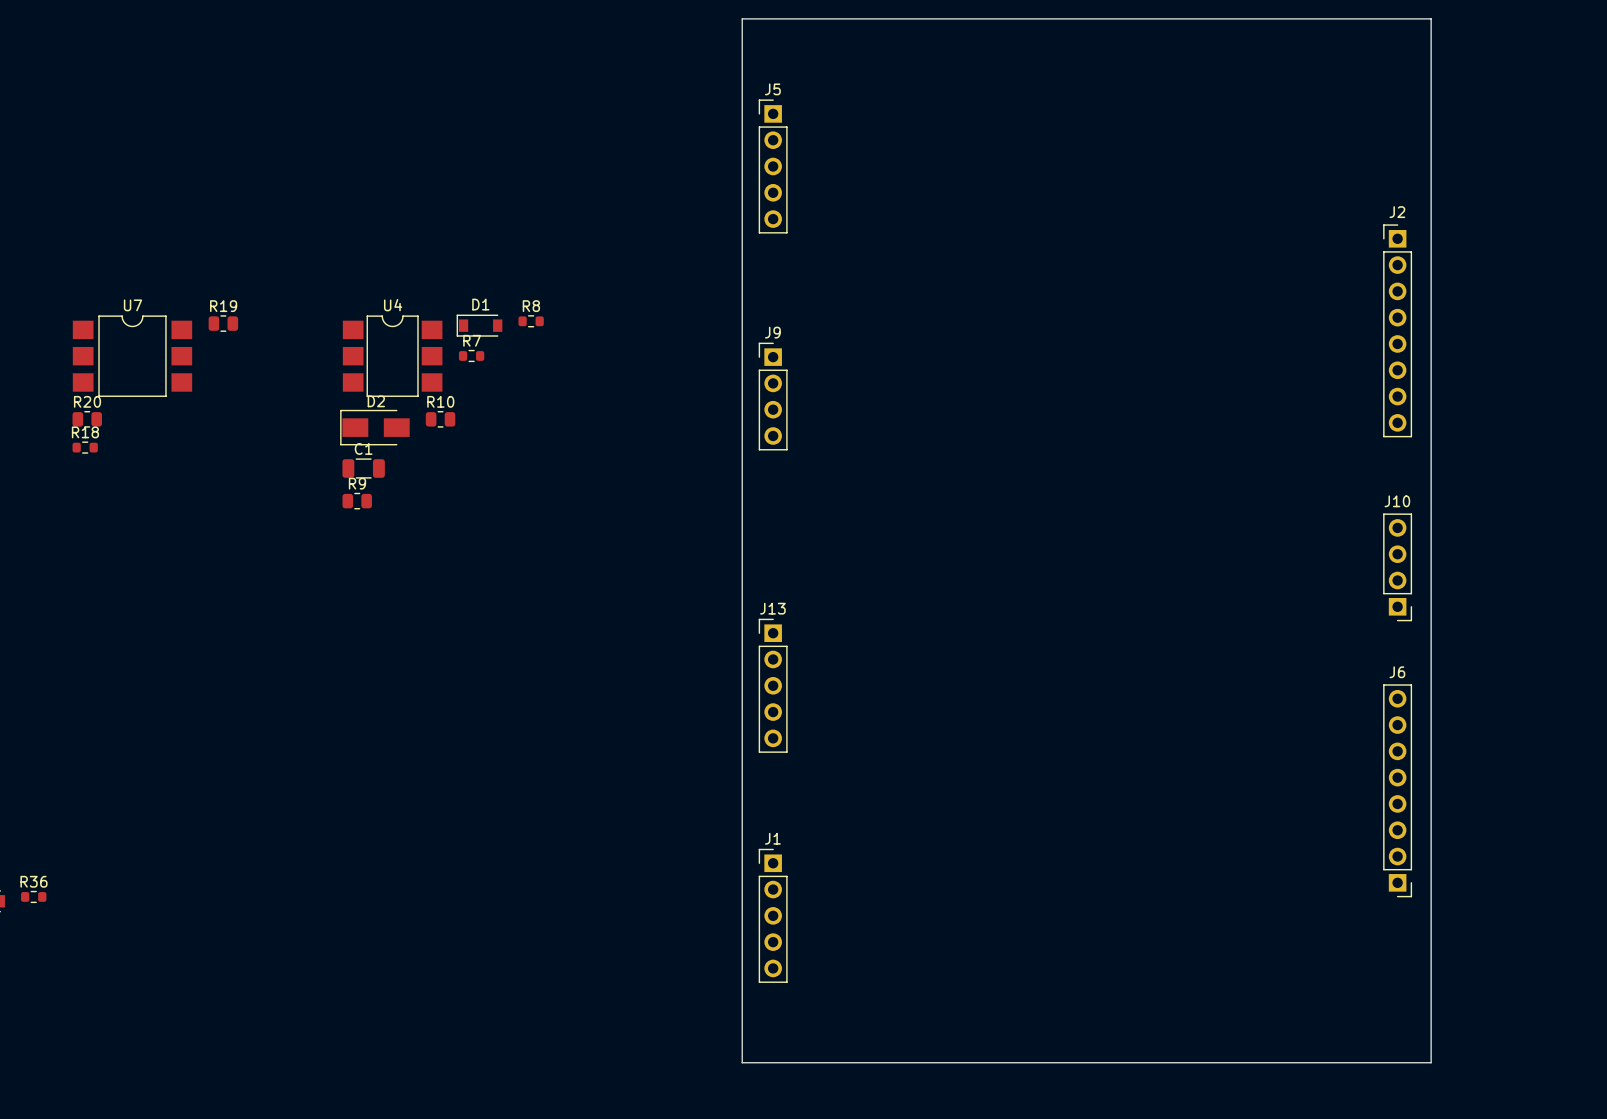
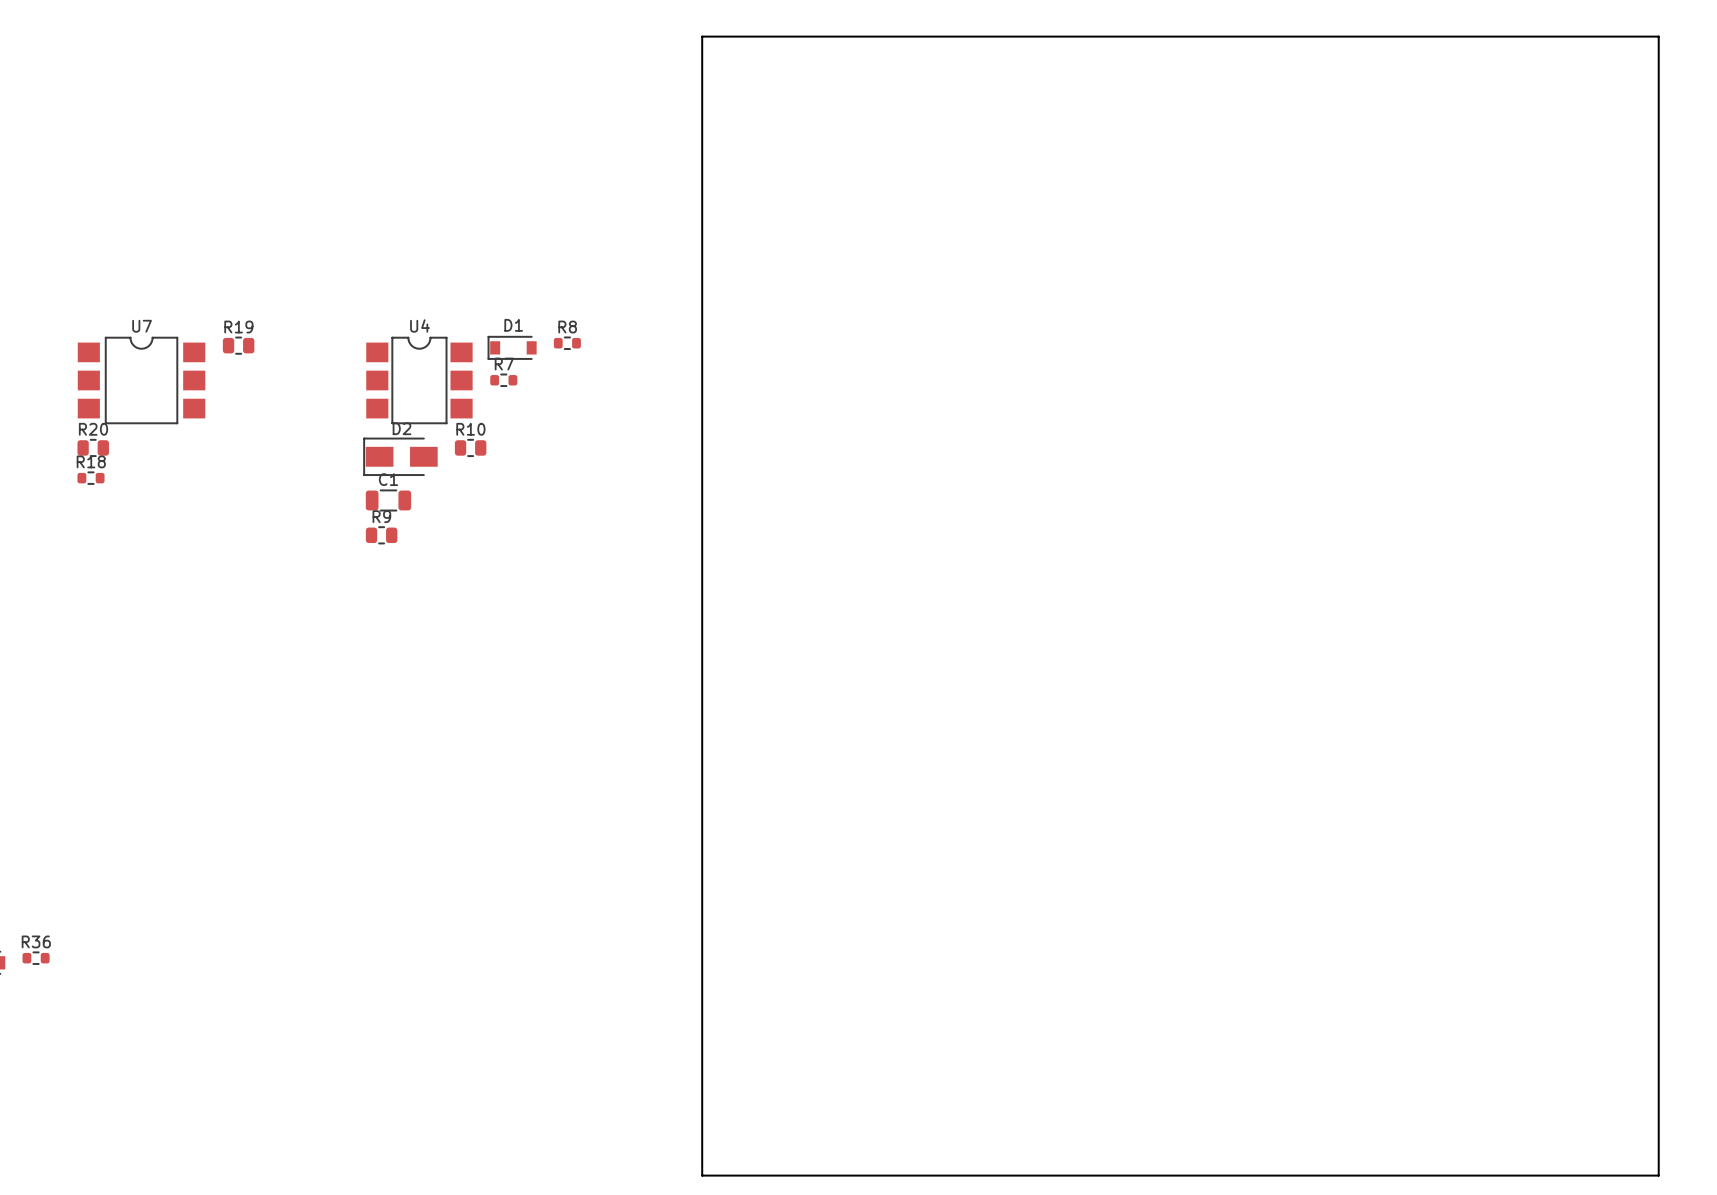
board edge: (742, 18) (742, 1062) (1431, 1062) (1431, 18) (742, 18) -> (702, 36) (702, 1175) (1658, 1175) (1658, 36) (702, 36)
J5: (773, 166) -> none
J2: (1397, 330) -> none
J9: (773, 396) -> none
J10: (1397, 567) -> none
J13: (773, 685) -> none
J6: (1397, 790) -> none
J1: (773, 915) -> none

